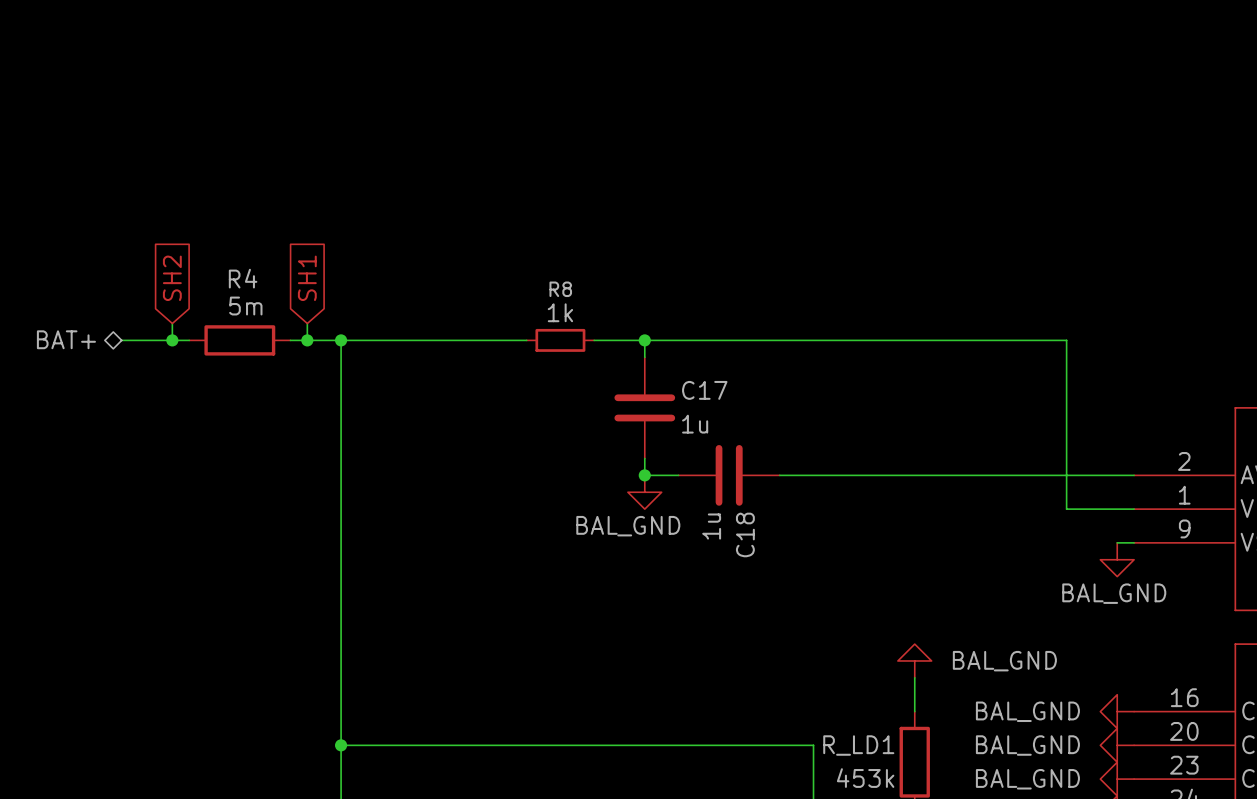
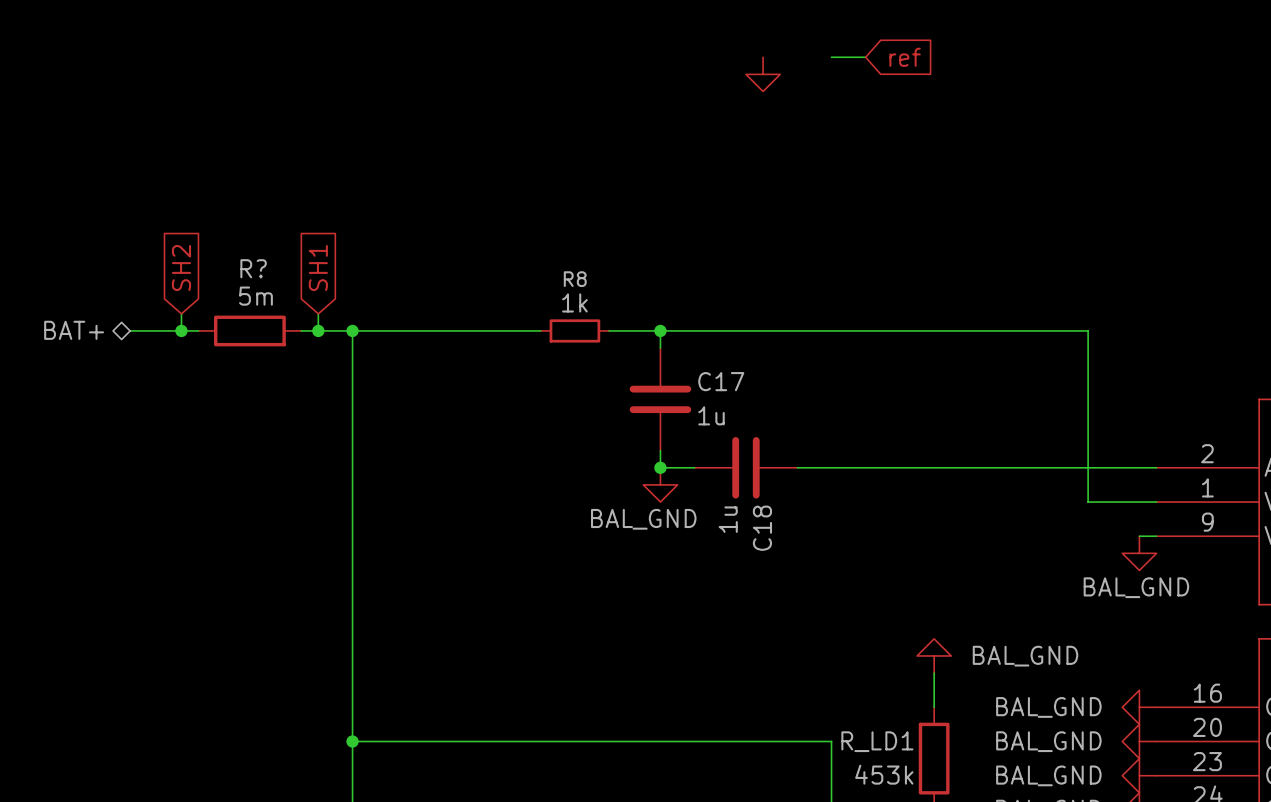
wire: none -> (831, 57) (865, 57)
global label: none -> ref (905, 57)
power symbol: none -> (763, 74)
R4 name: R4 (243, 278) -> R? (253, 268)

